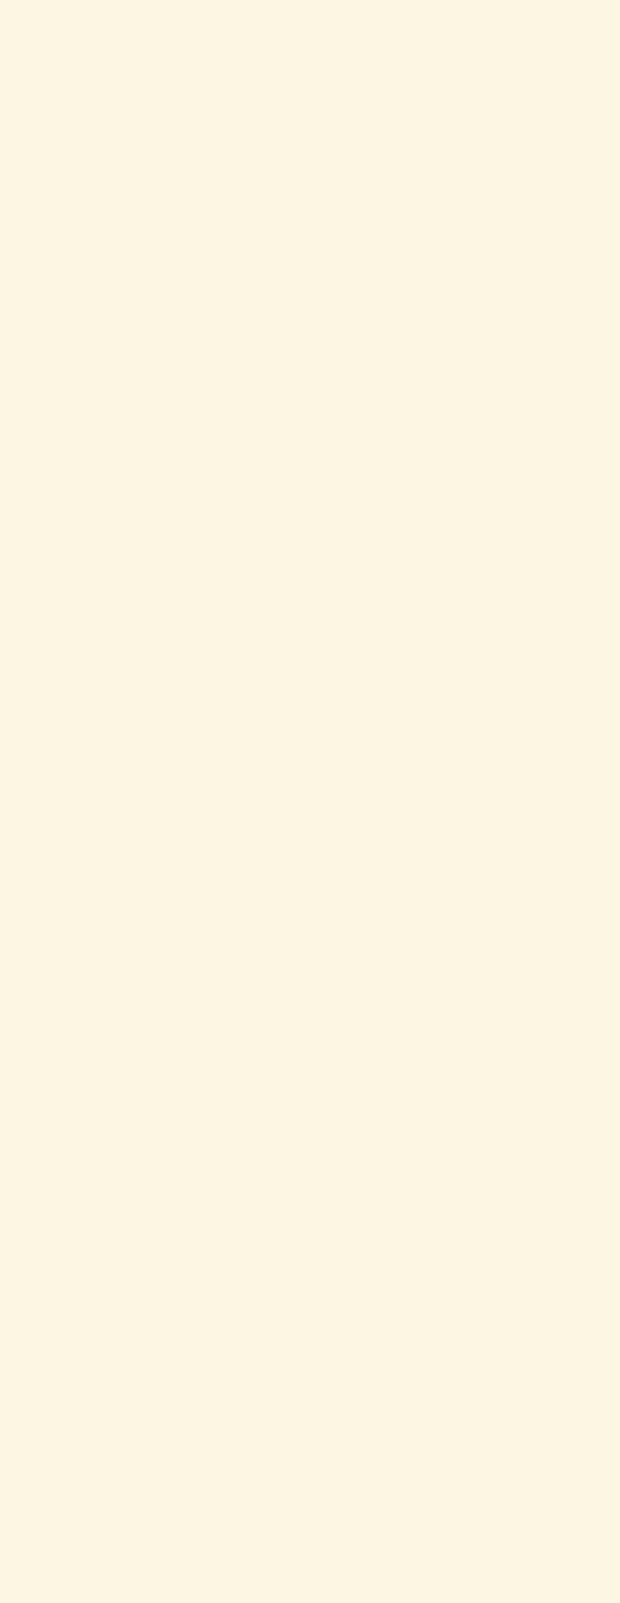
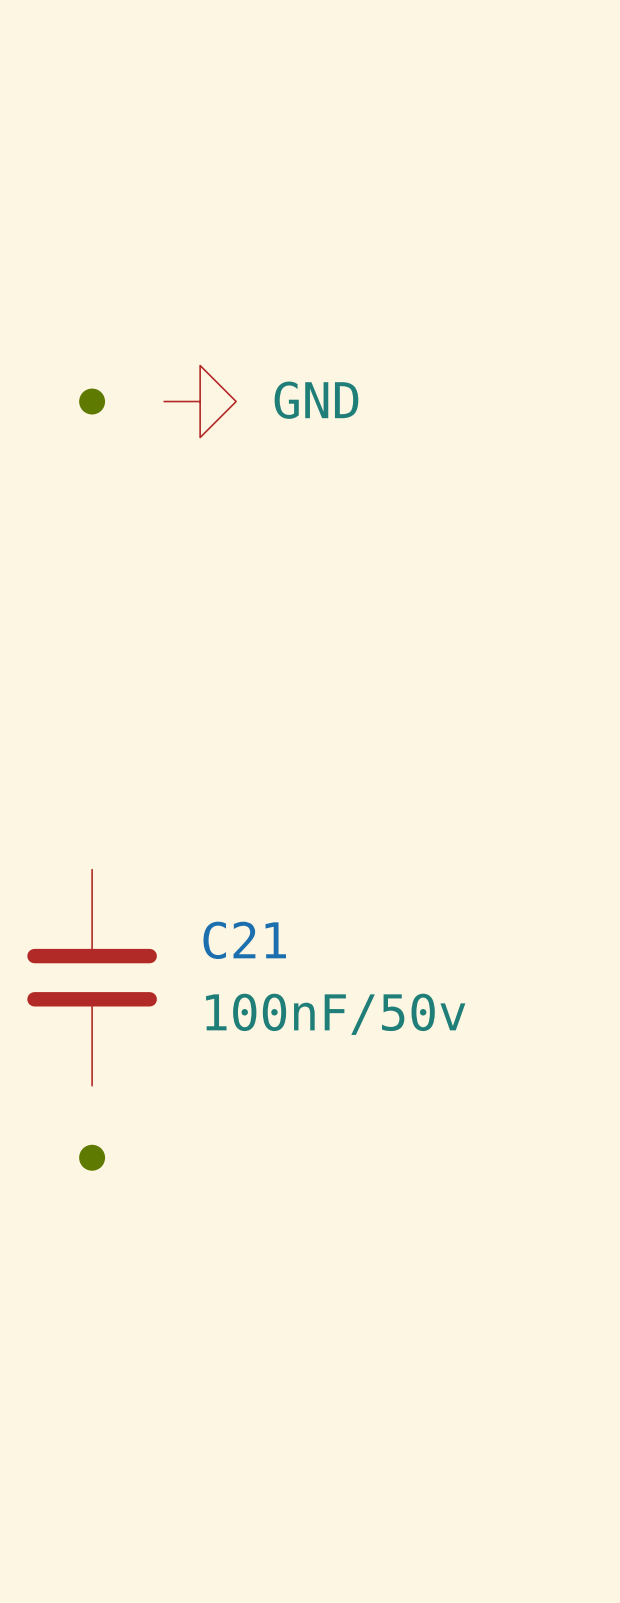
junction: none -> (92, 401)
power symbol: none -> GND (200, 401)
C21: none -> 100nF/50v (92, 977)
junction: none -> (92, 1157)

